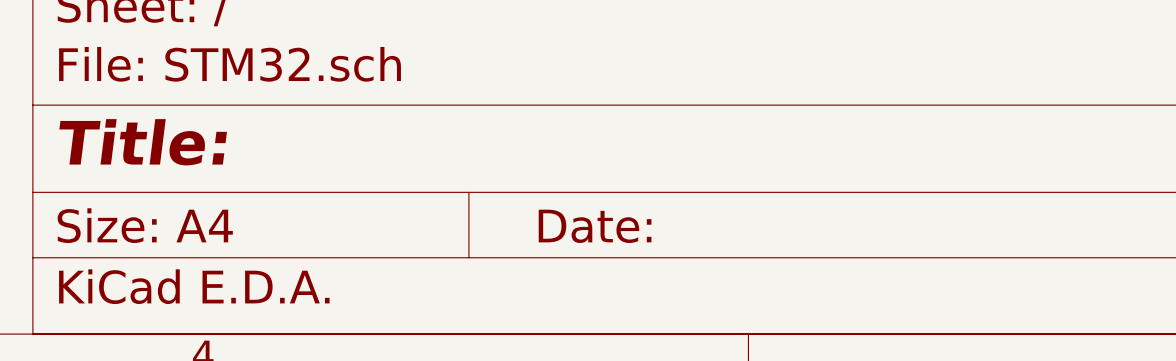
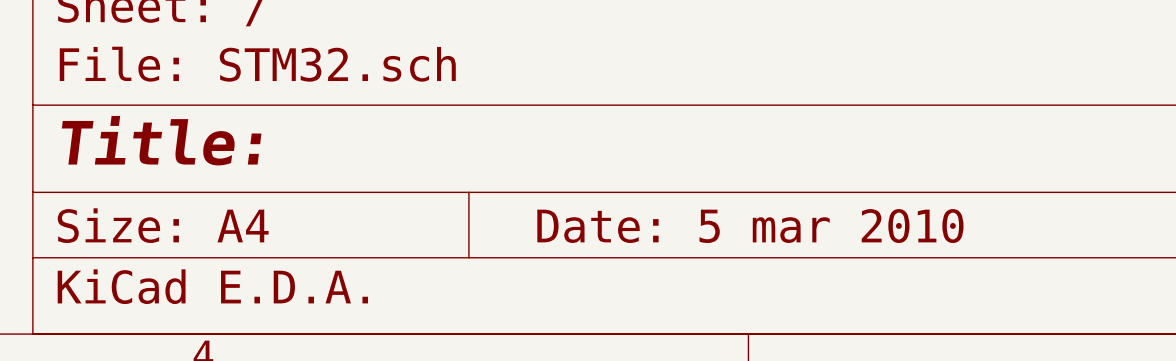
title block: Date: (595, 226) -> Date: 5 mar 2010 (750, 226)

